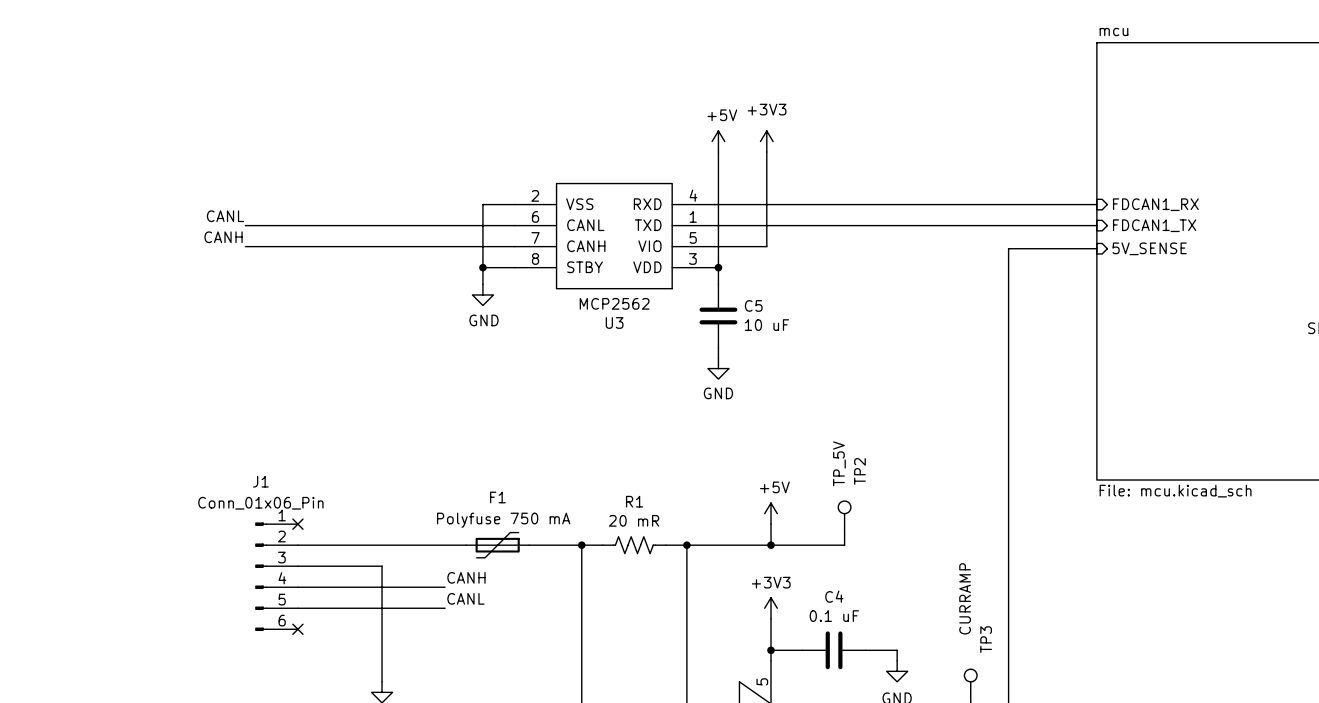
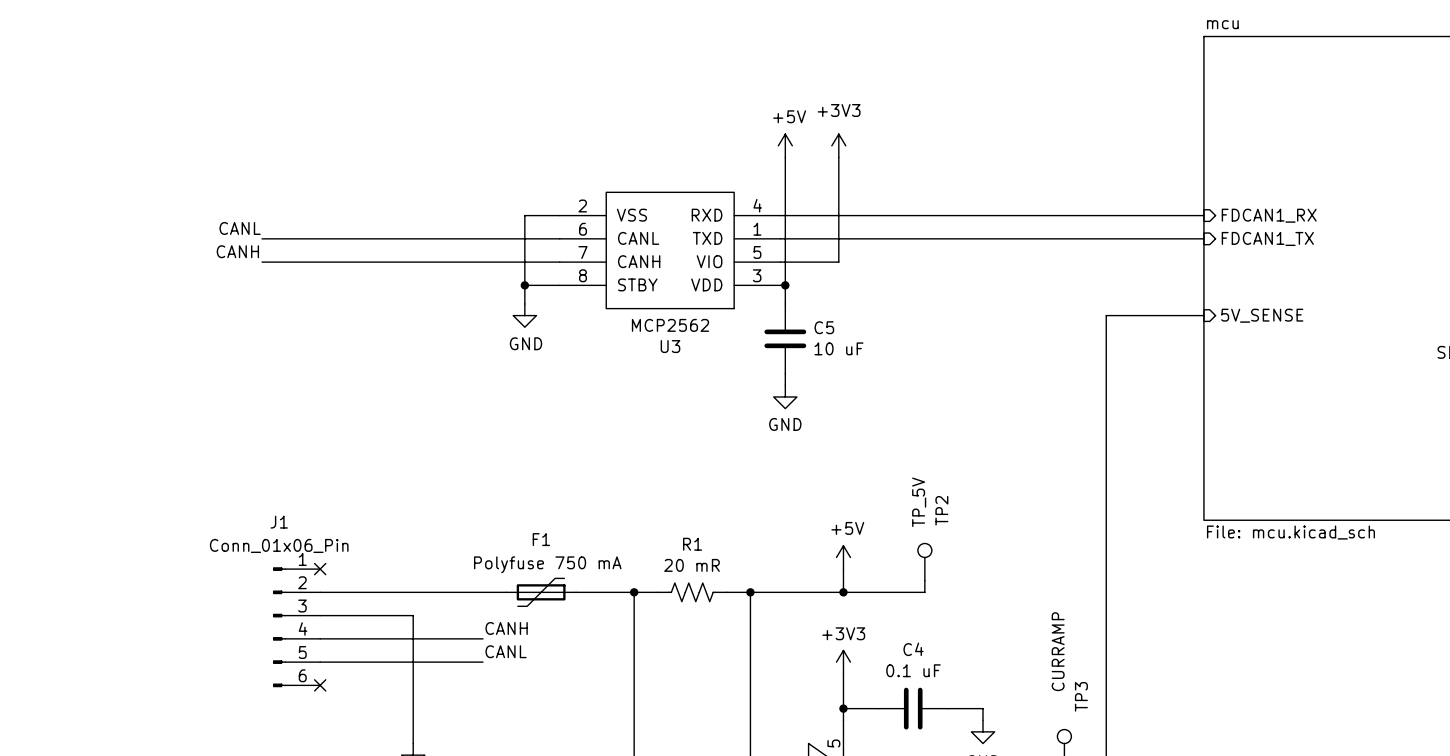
wire: (1096, 248) (1008, 248) (1008, 294) -> (1203, 315) (1106, 315)
sheet pin position: 5V_SENSE (1149, 248) -> 5V_SENSE (1262, 315)

